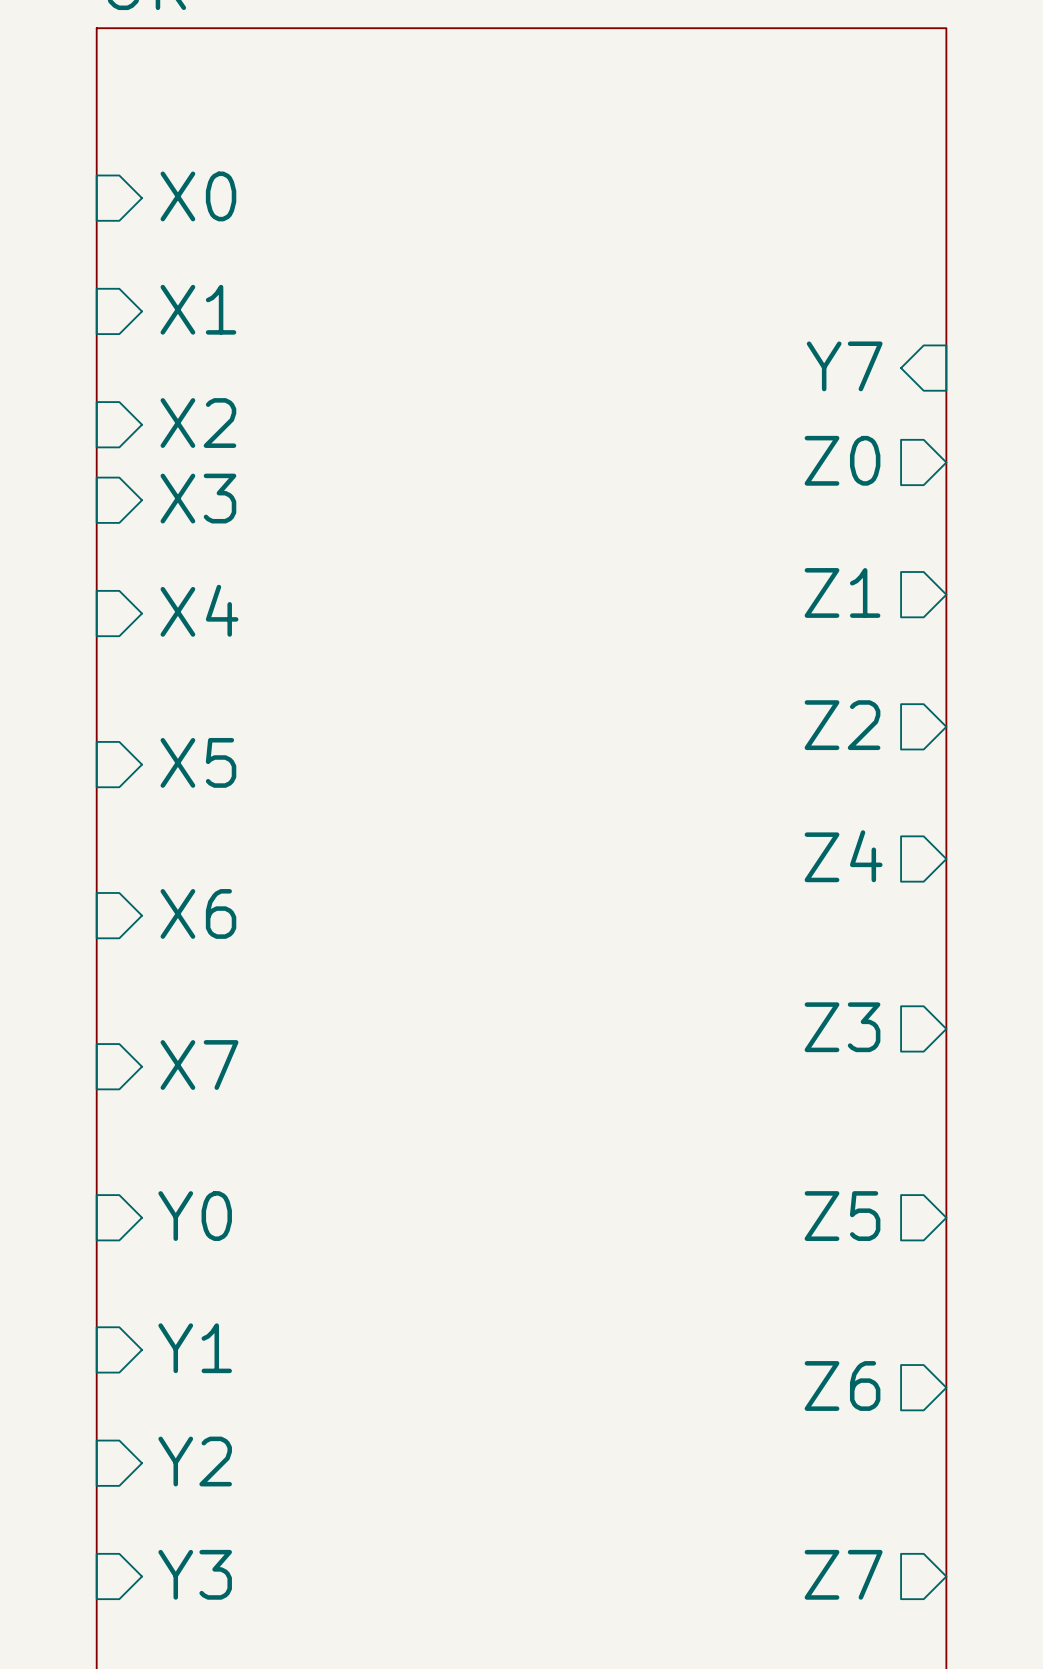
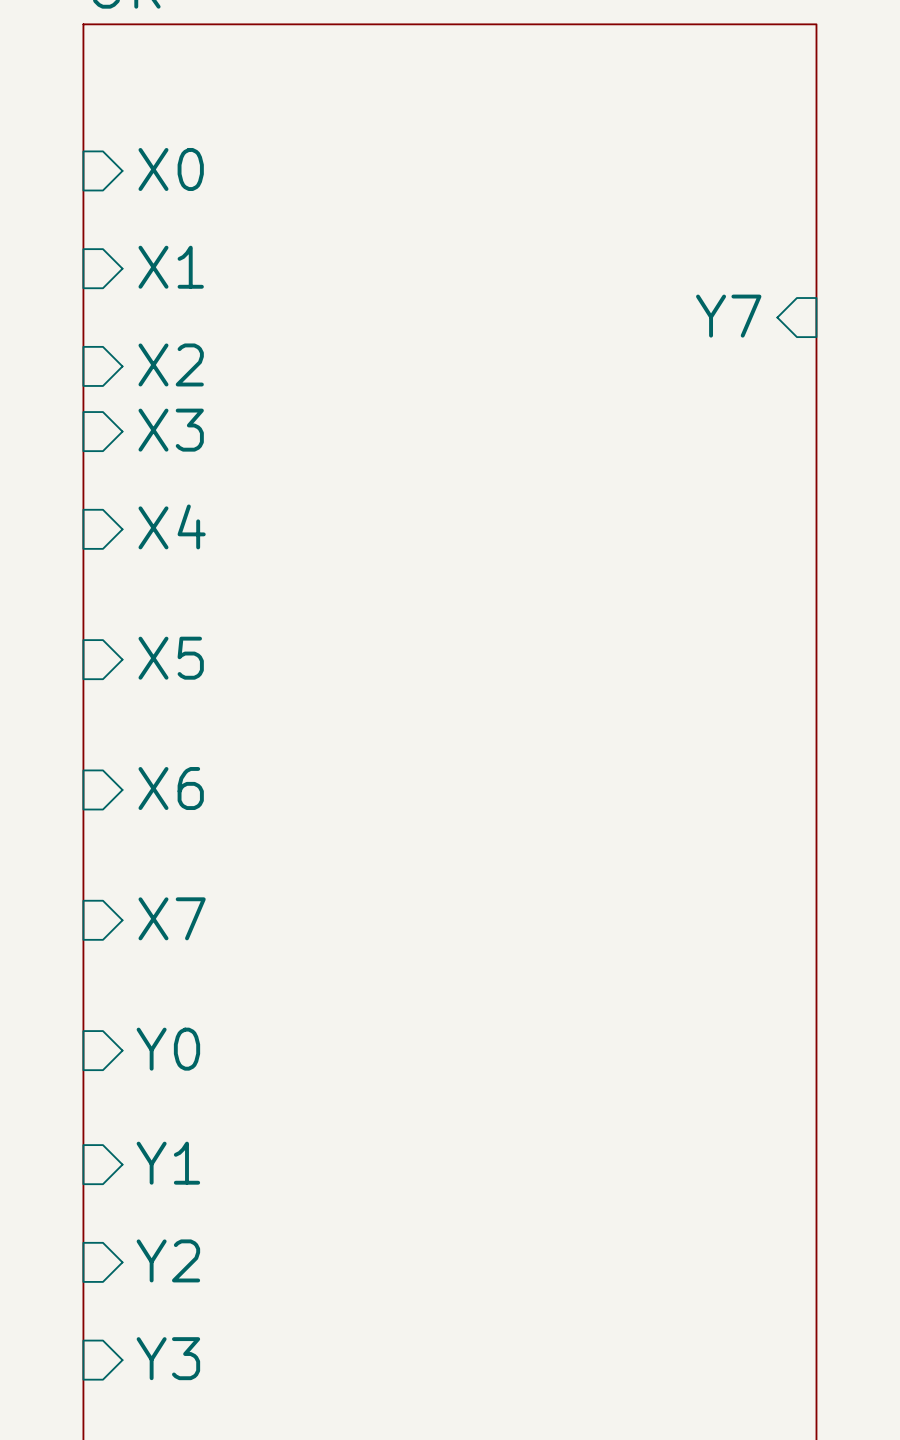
sheet pin: Z0 (842, 460) -> none
sheet pin: Z1 (842, 592) -> none
sheet pin: Z2 (842, 725) -> none
sheet pin: Z4 (843, 856) -> none
sheet pin: Z3 (842, 1027) -> none
sheet pin: Z5 (842, 1216) -> none
sheet pin: Z6 (842, 1385) -> none
sheet pin: Z7 (843, 1574) -> none

